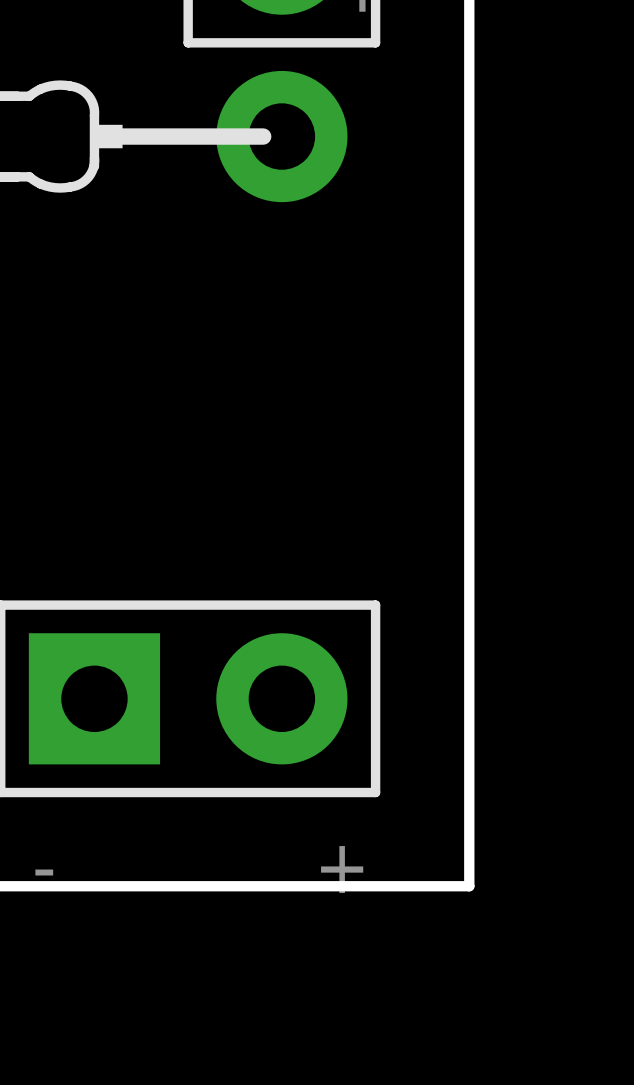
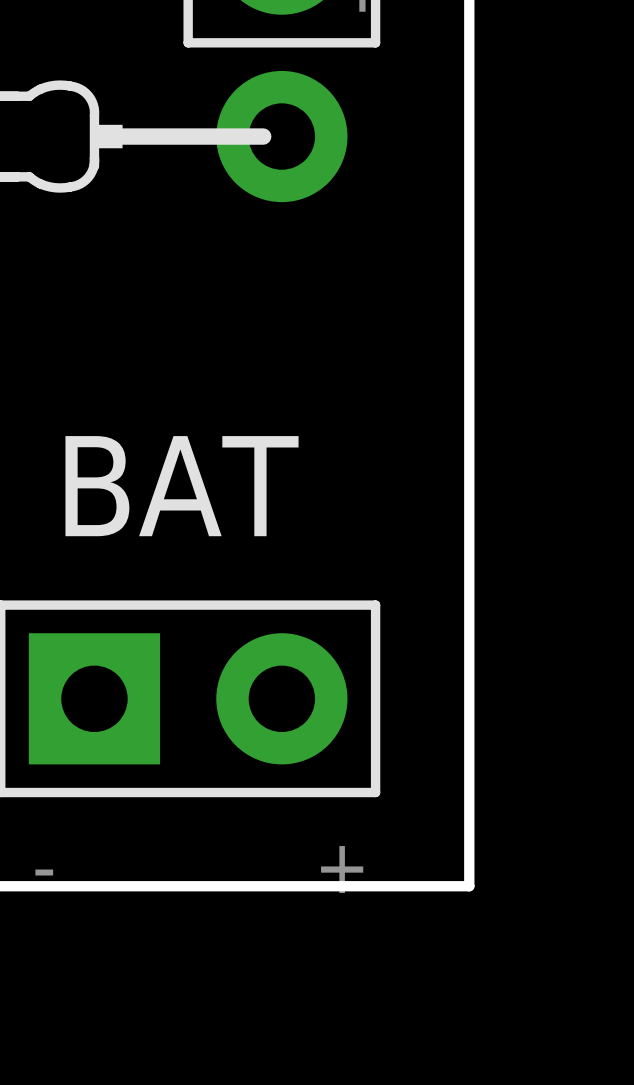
BAT name: none -> BAT (182, 486)

